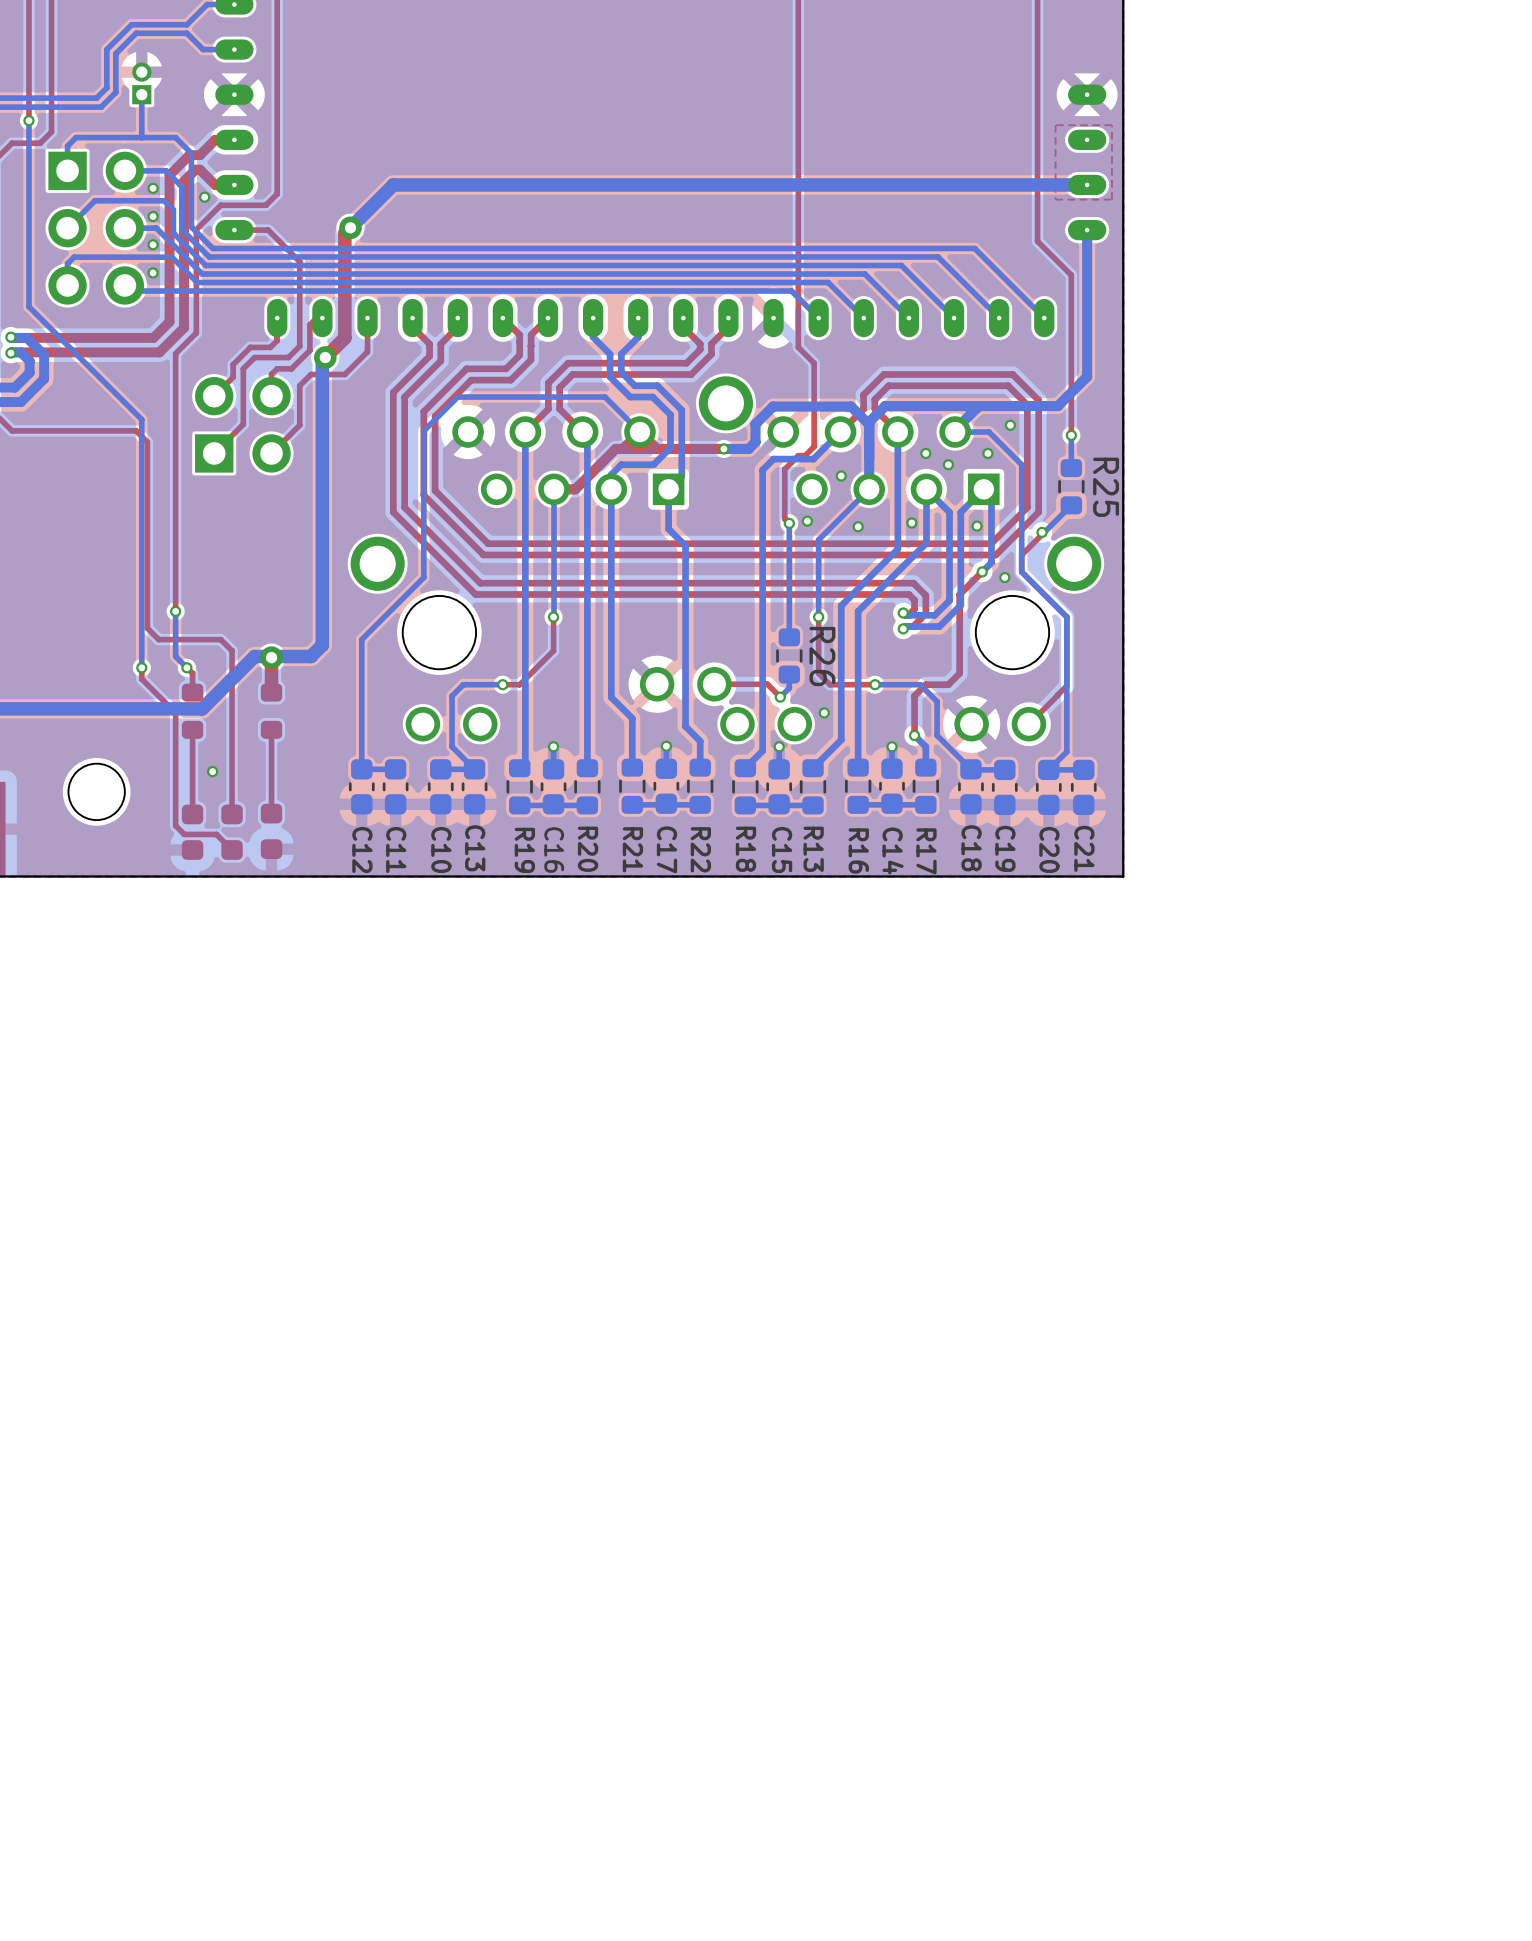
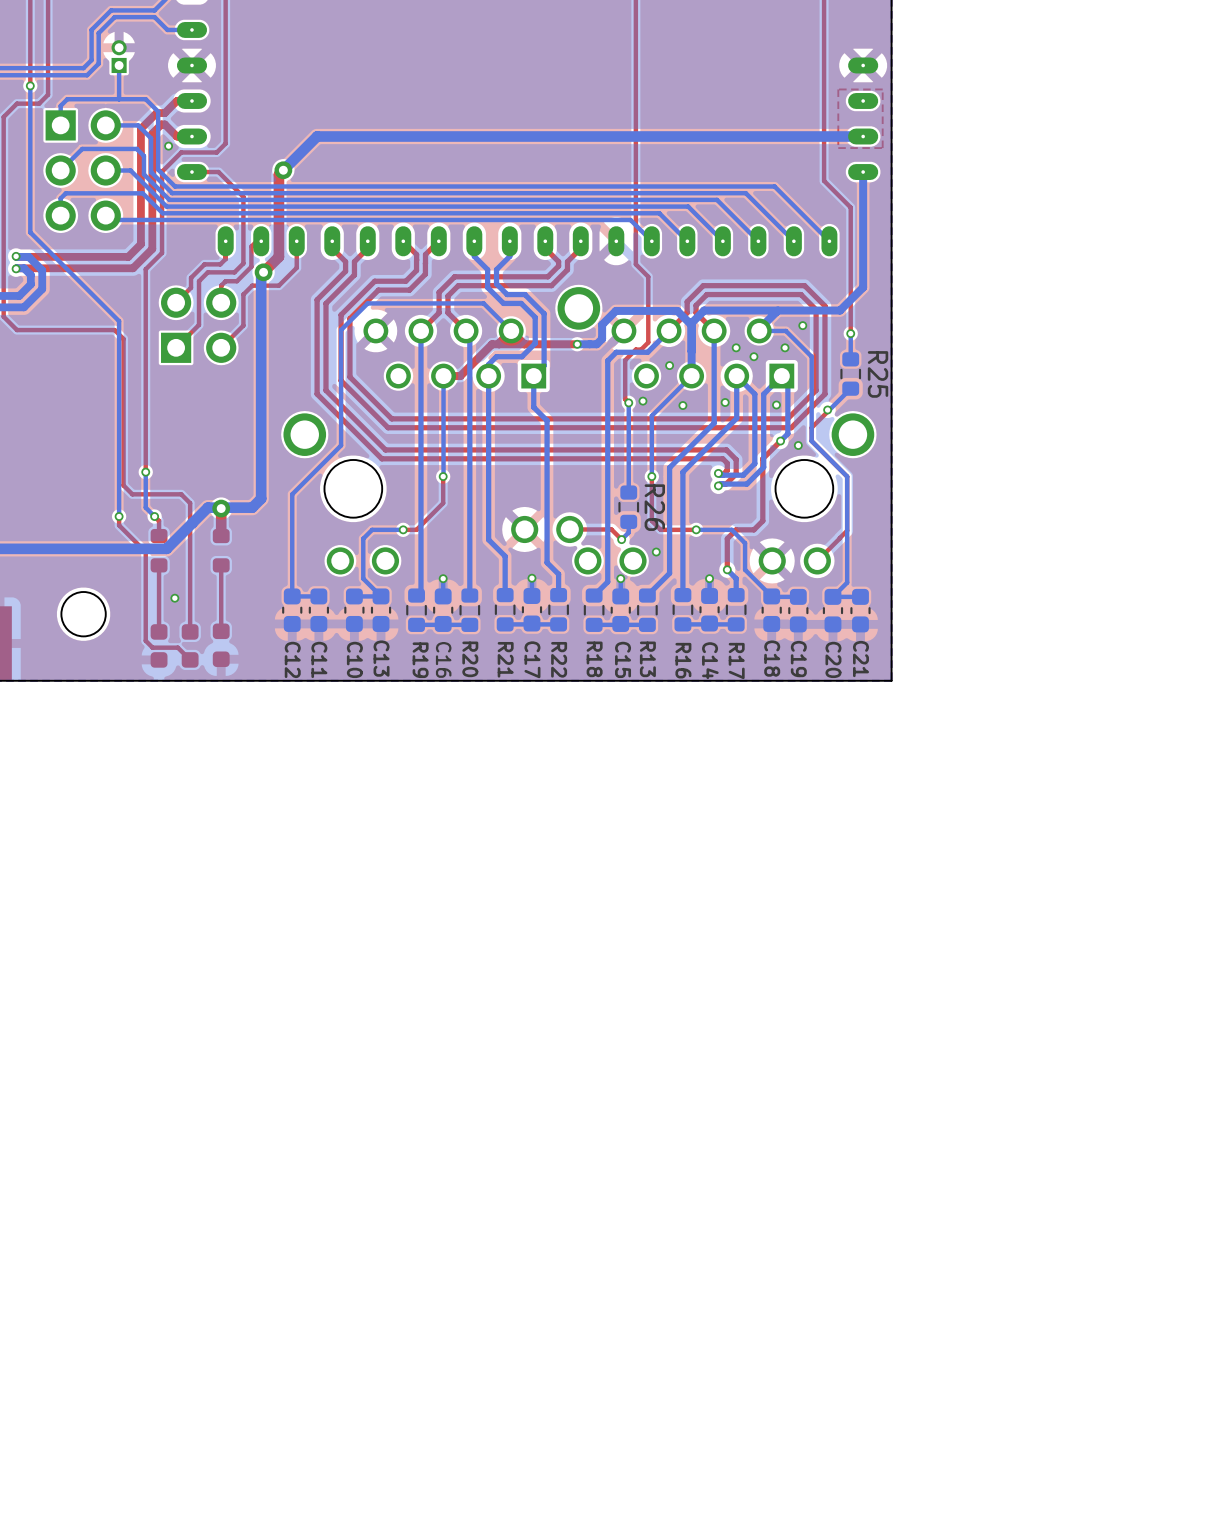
via: (153, 188) -> none
via: (153, 216) -> none
via: (153, 244) -> none
via: (153, 272) -> none

